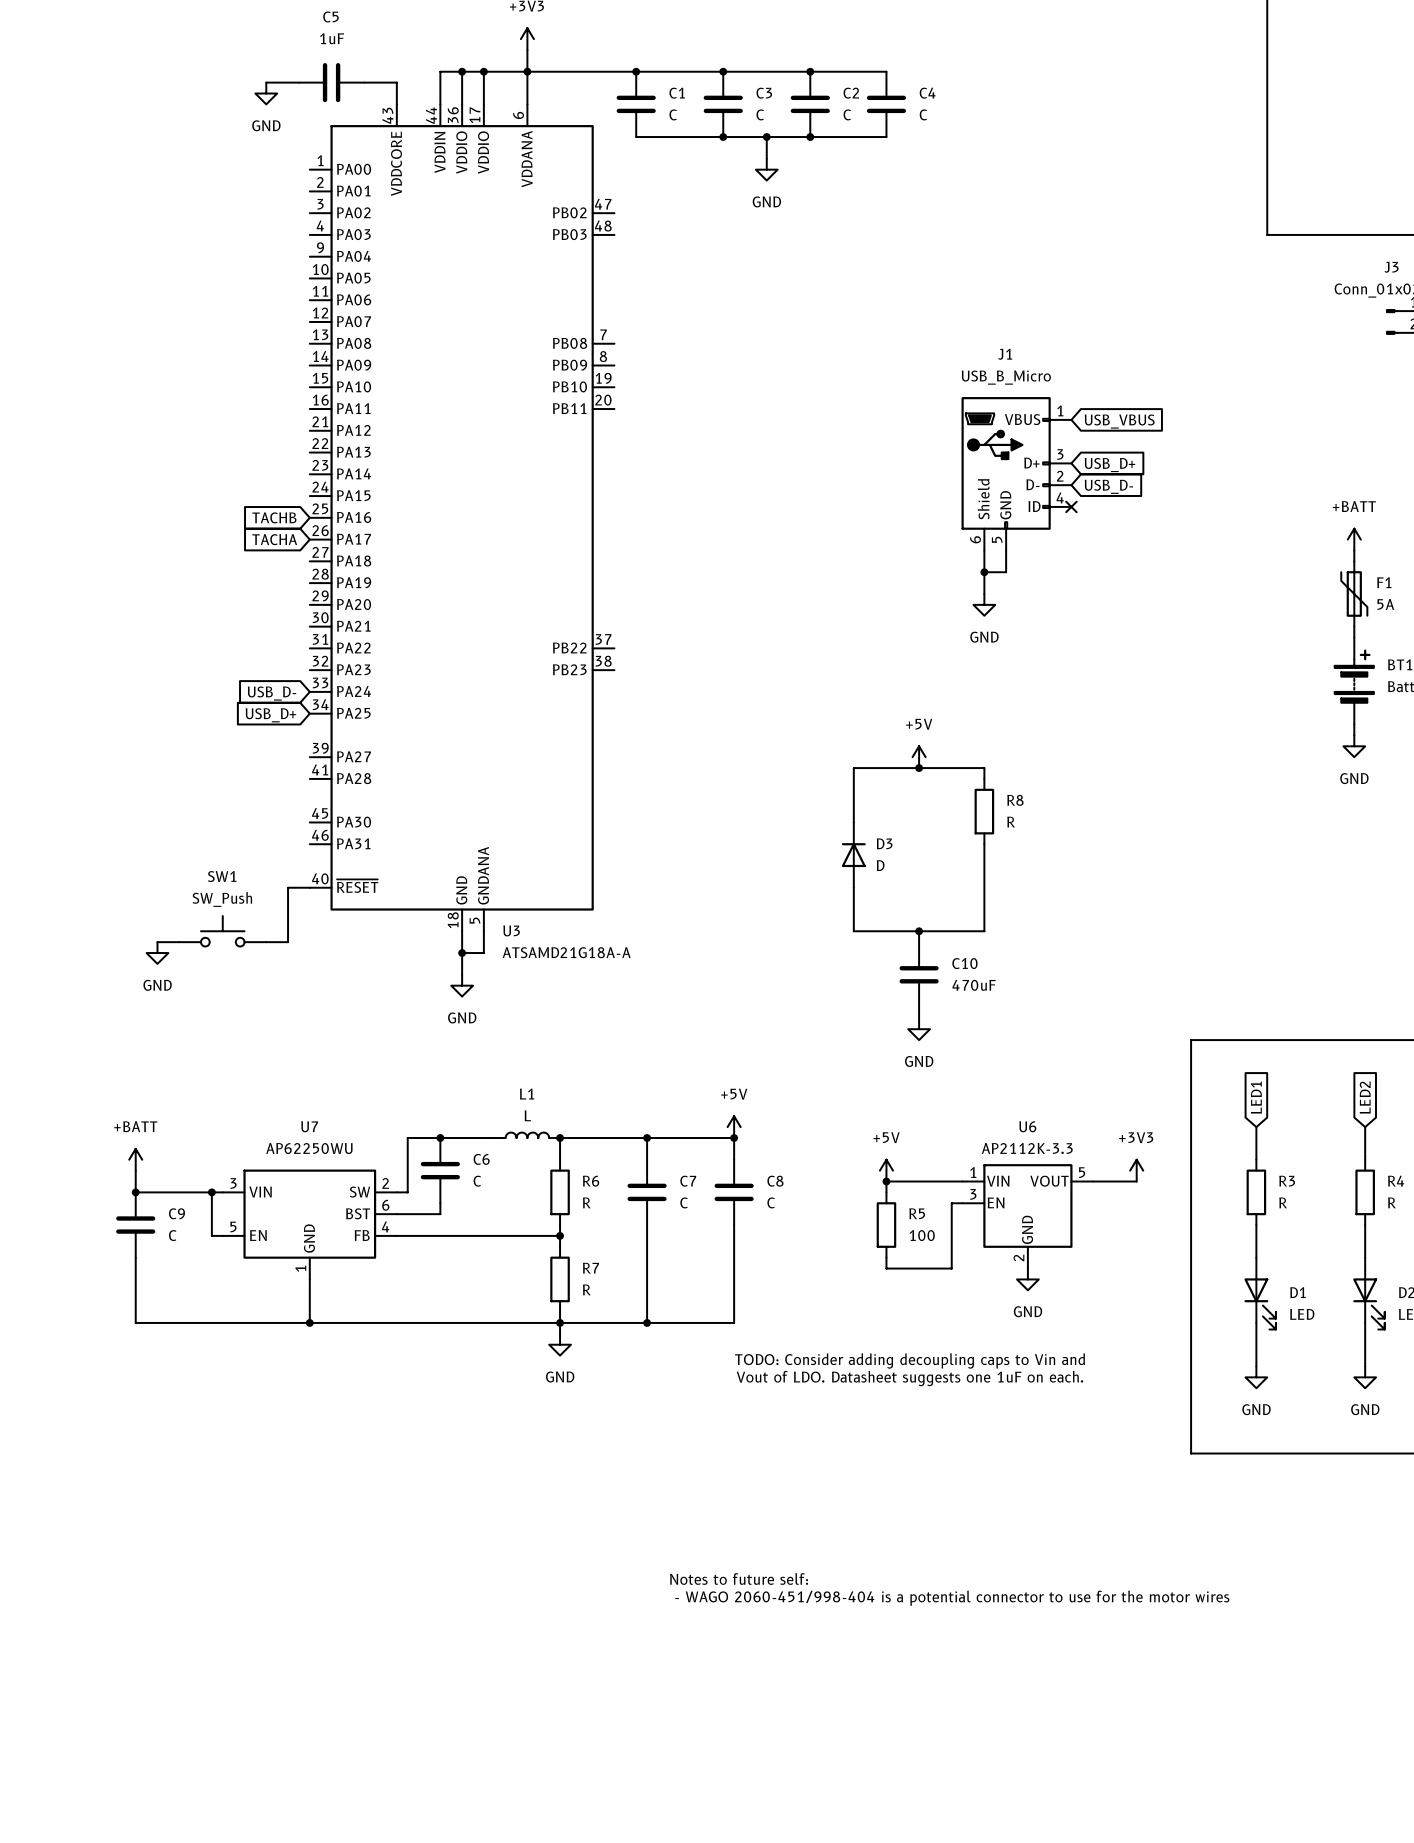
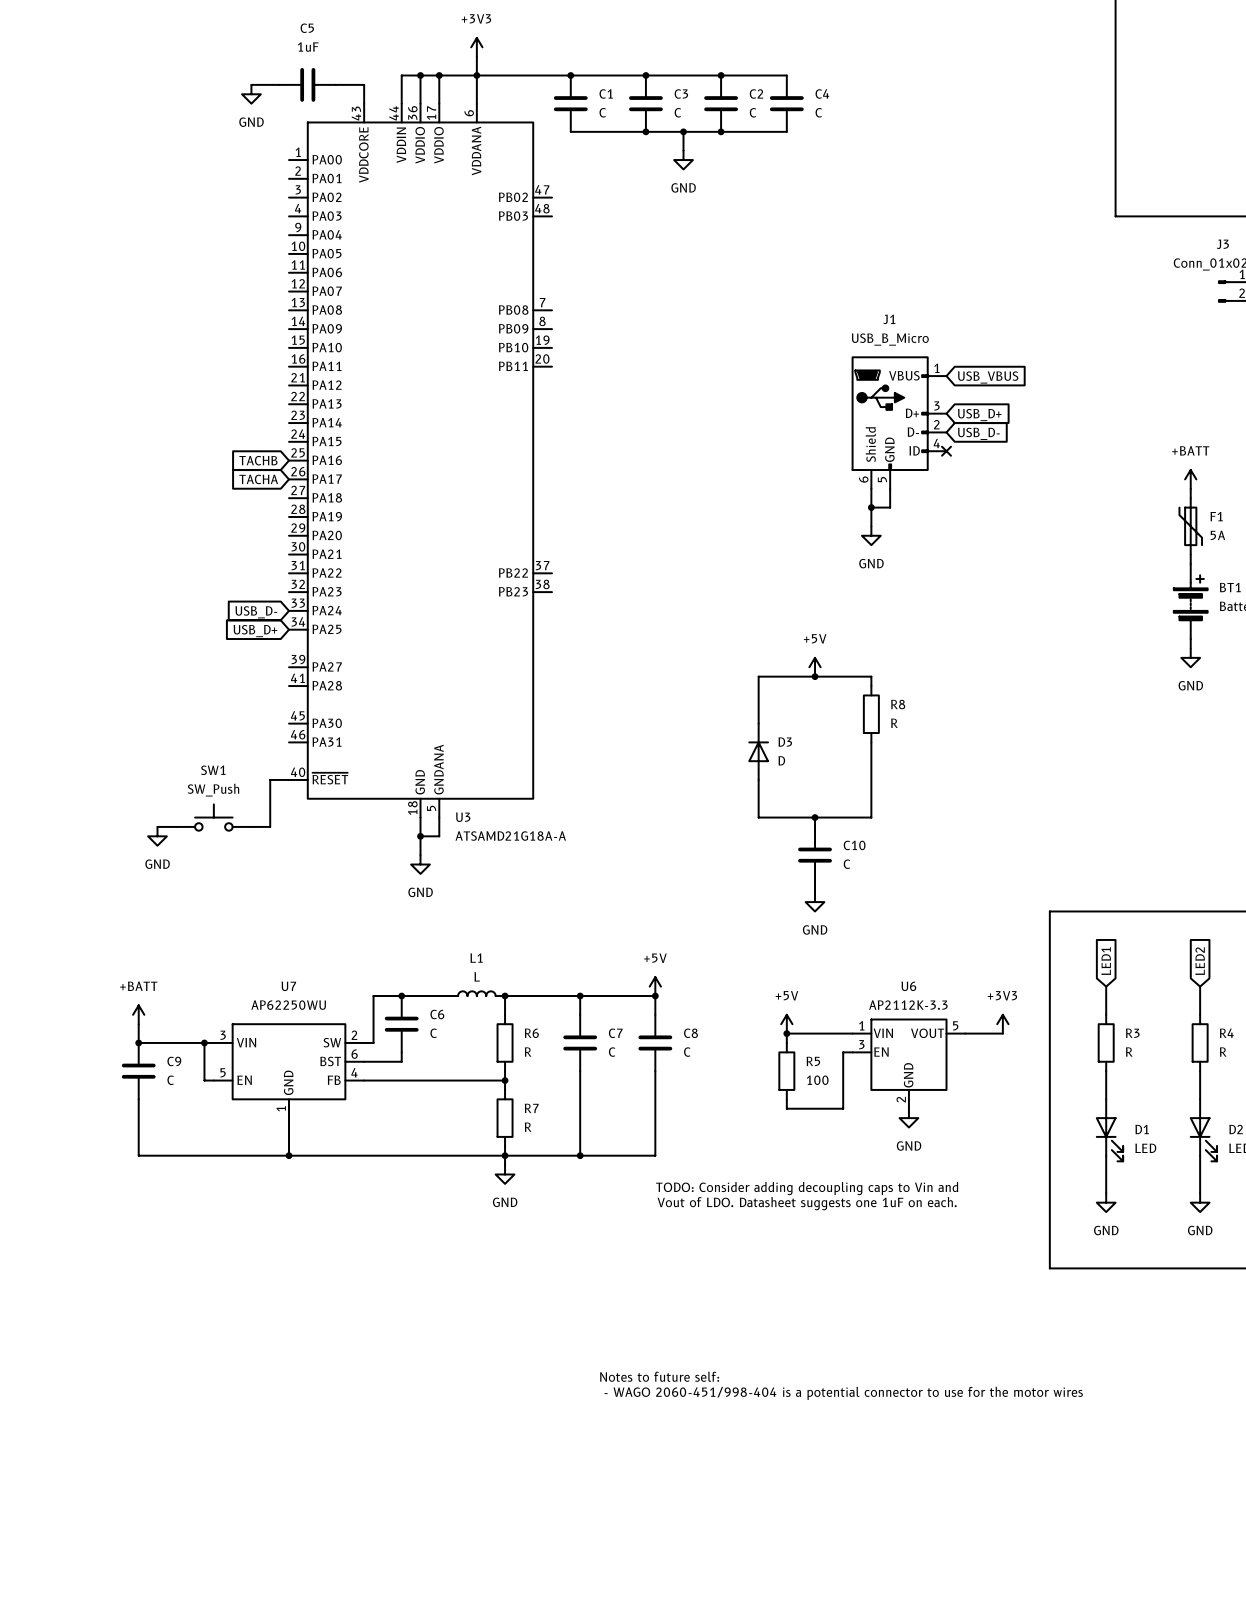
C10 value: 470uF (974, 985) -> C (846, 864)

